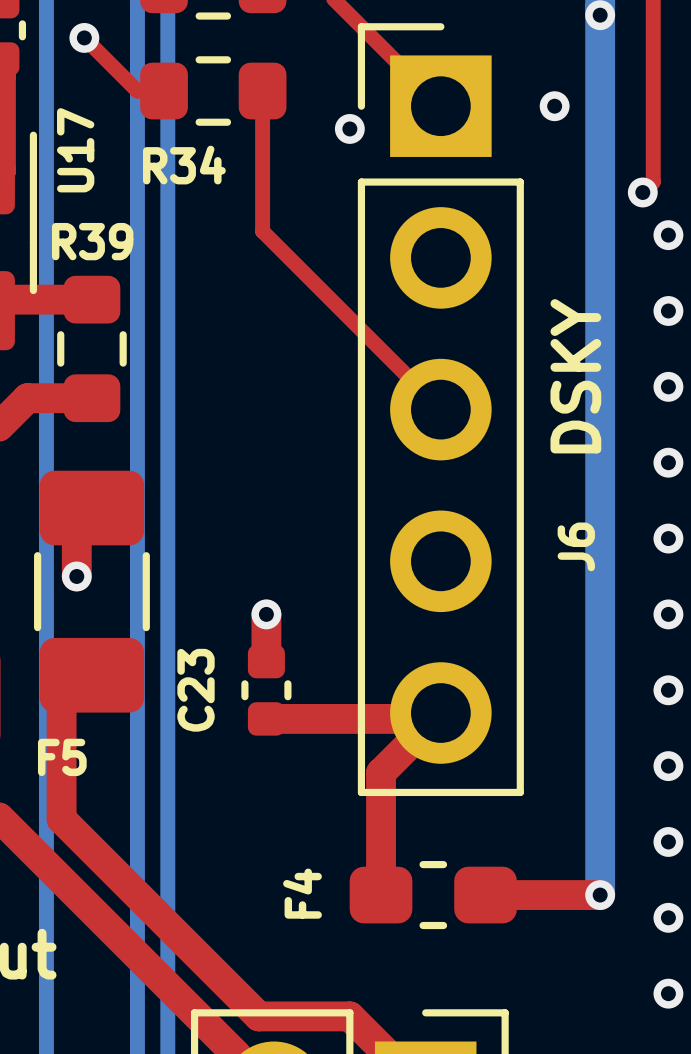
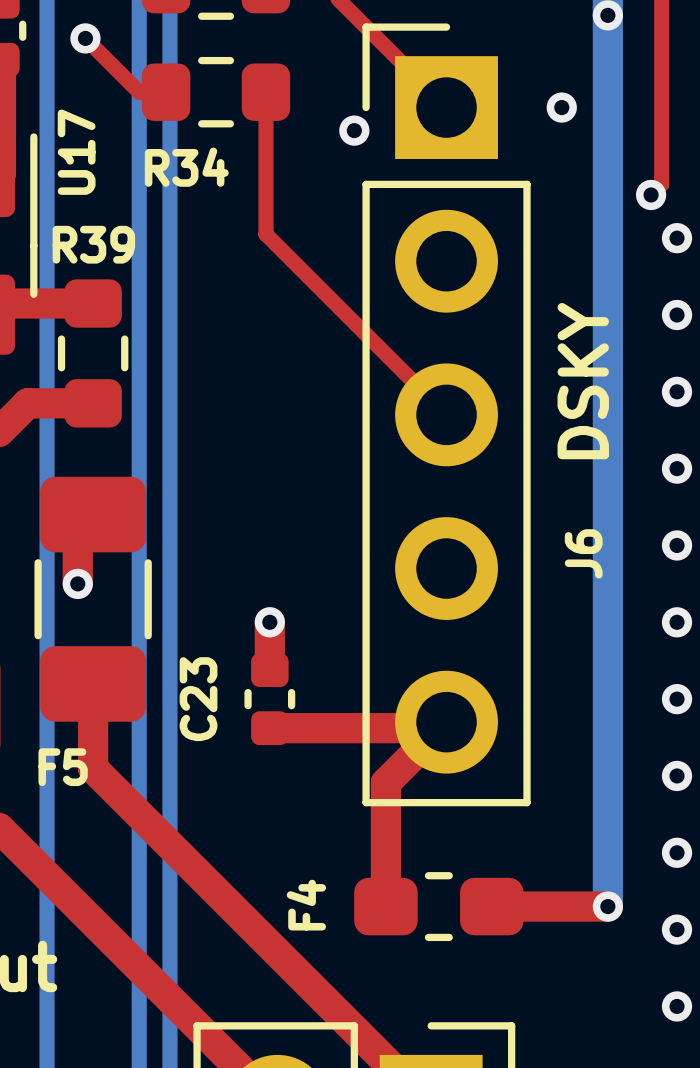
top track: (61, 675) (61, 819) (258, 1016) (349, 1016) -> (93, 683) (93, 768) (354, 1029)

